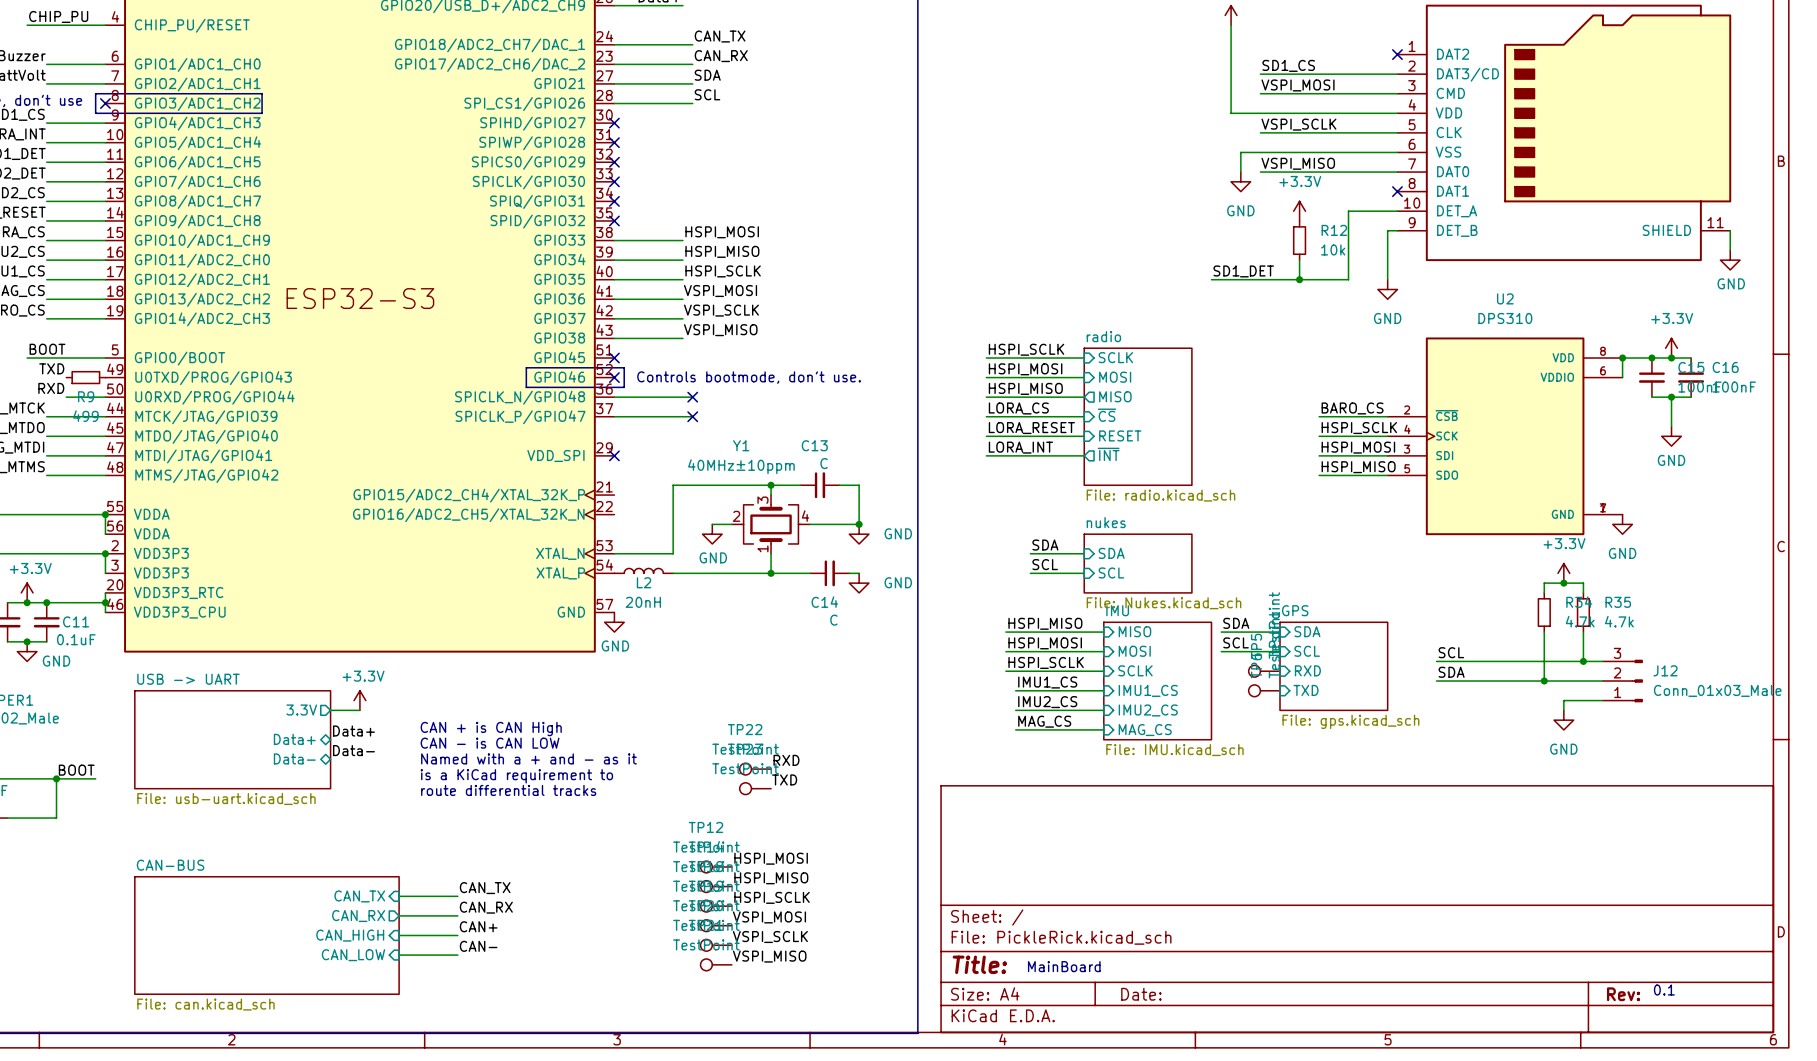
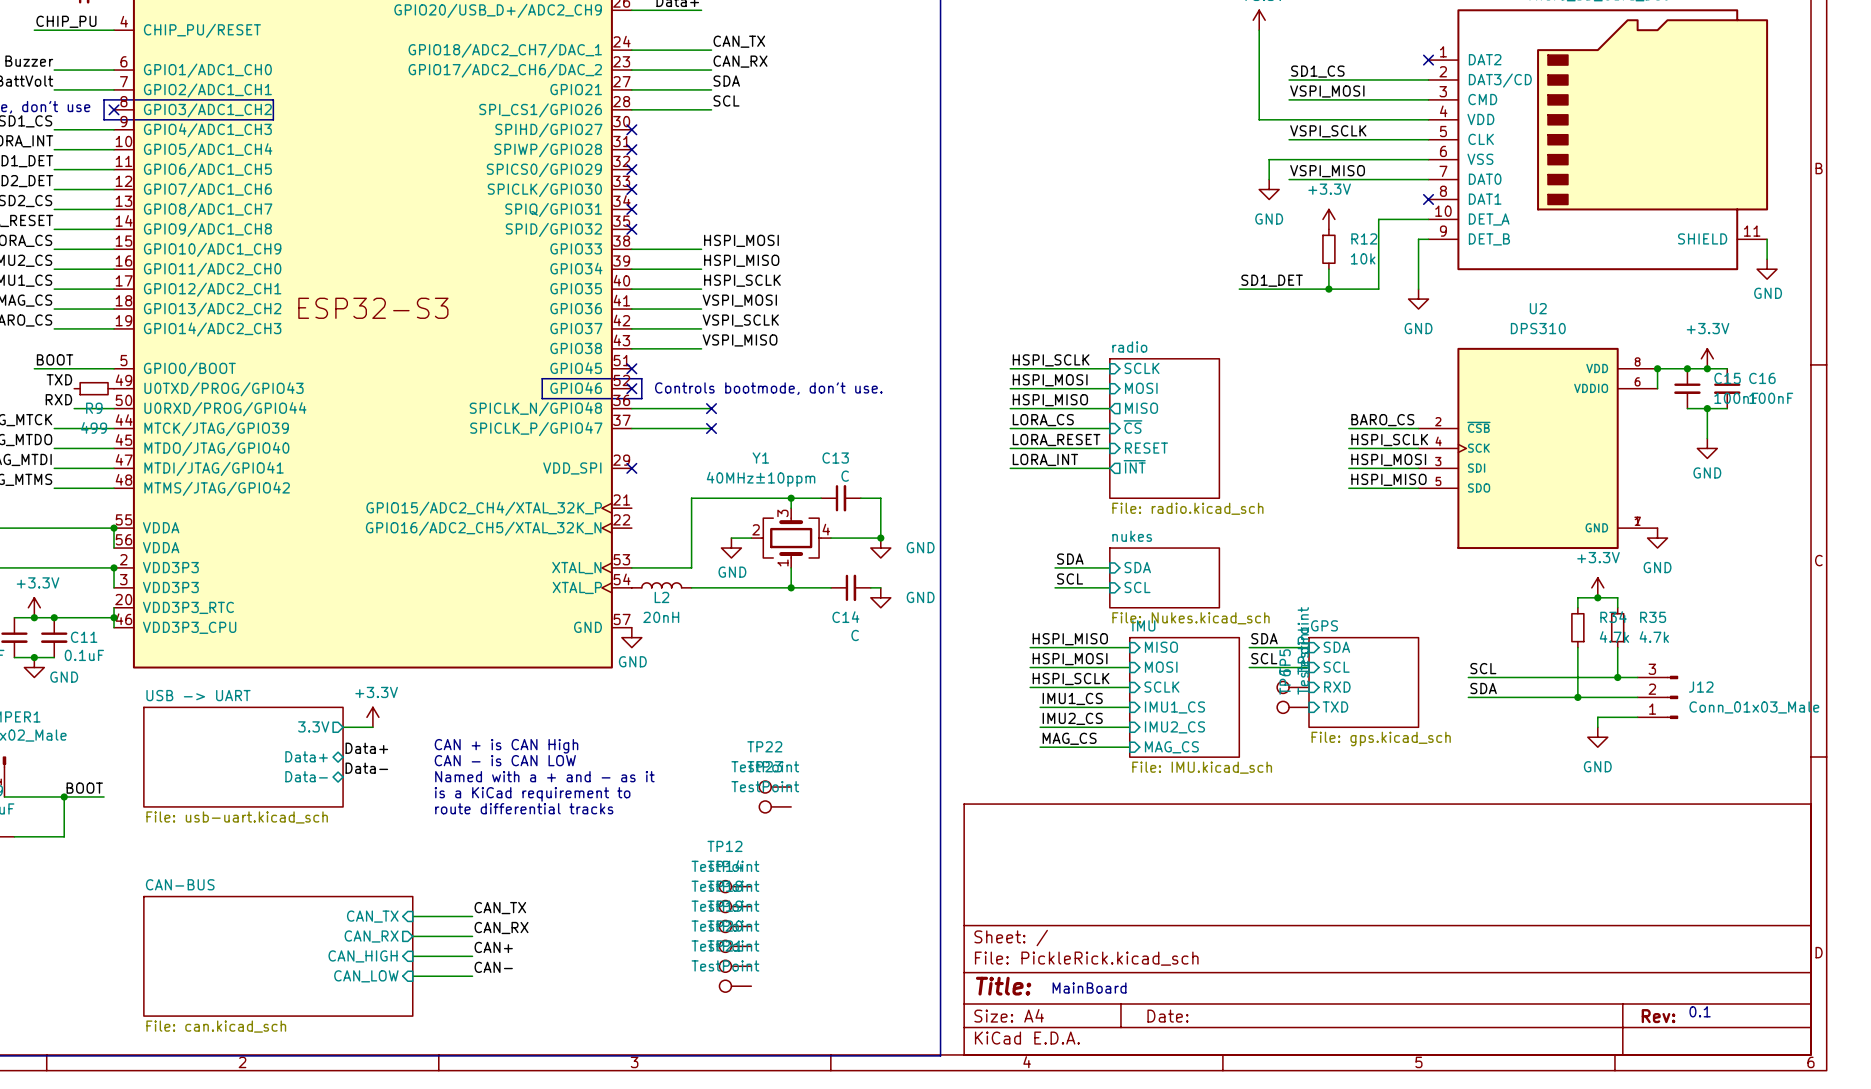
label: RXD (786, 760) -> none
label: TXD (784, 779) -> none
label: HSPI_MOSI (771, 858) -> none
label: HSPI_MISO (771, 878) -> none
label: HSPI_SCLK (772, 897) -> none
label: VSPI_MOSI (769, 917) -> none
label: VSPI_SCLK (770, 937) -> none
label: VSPI_MISO (769, 956) -> none

